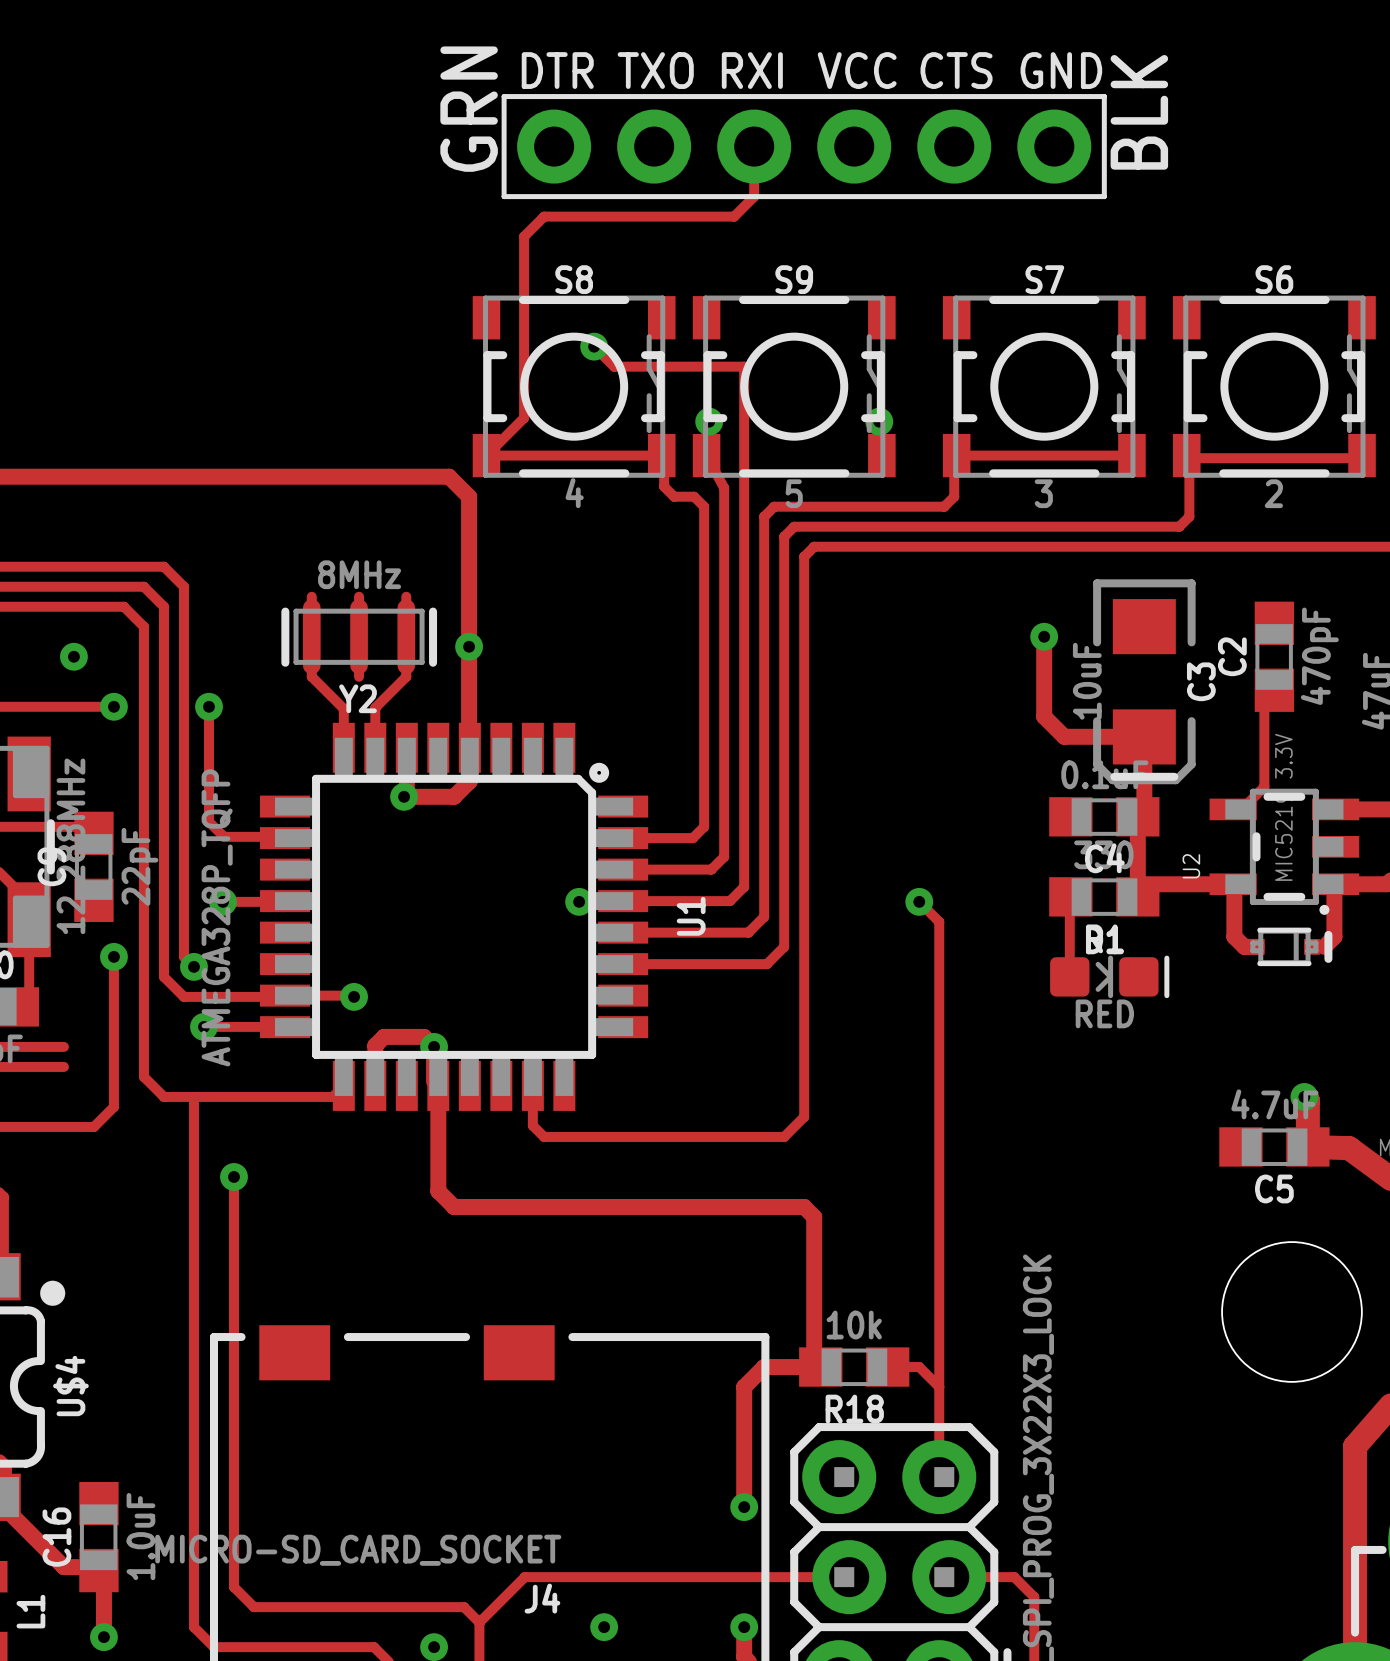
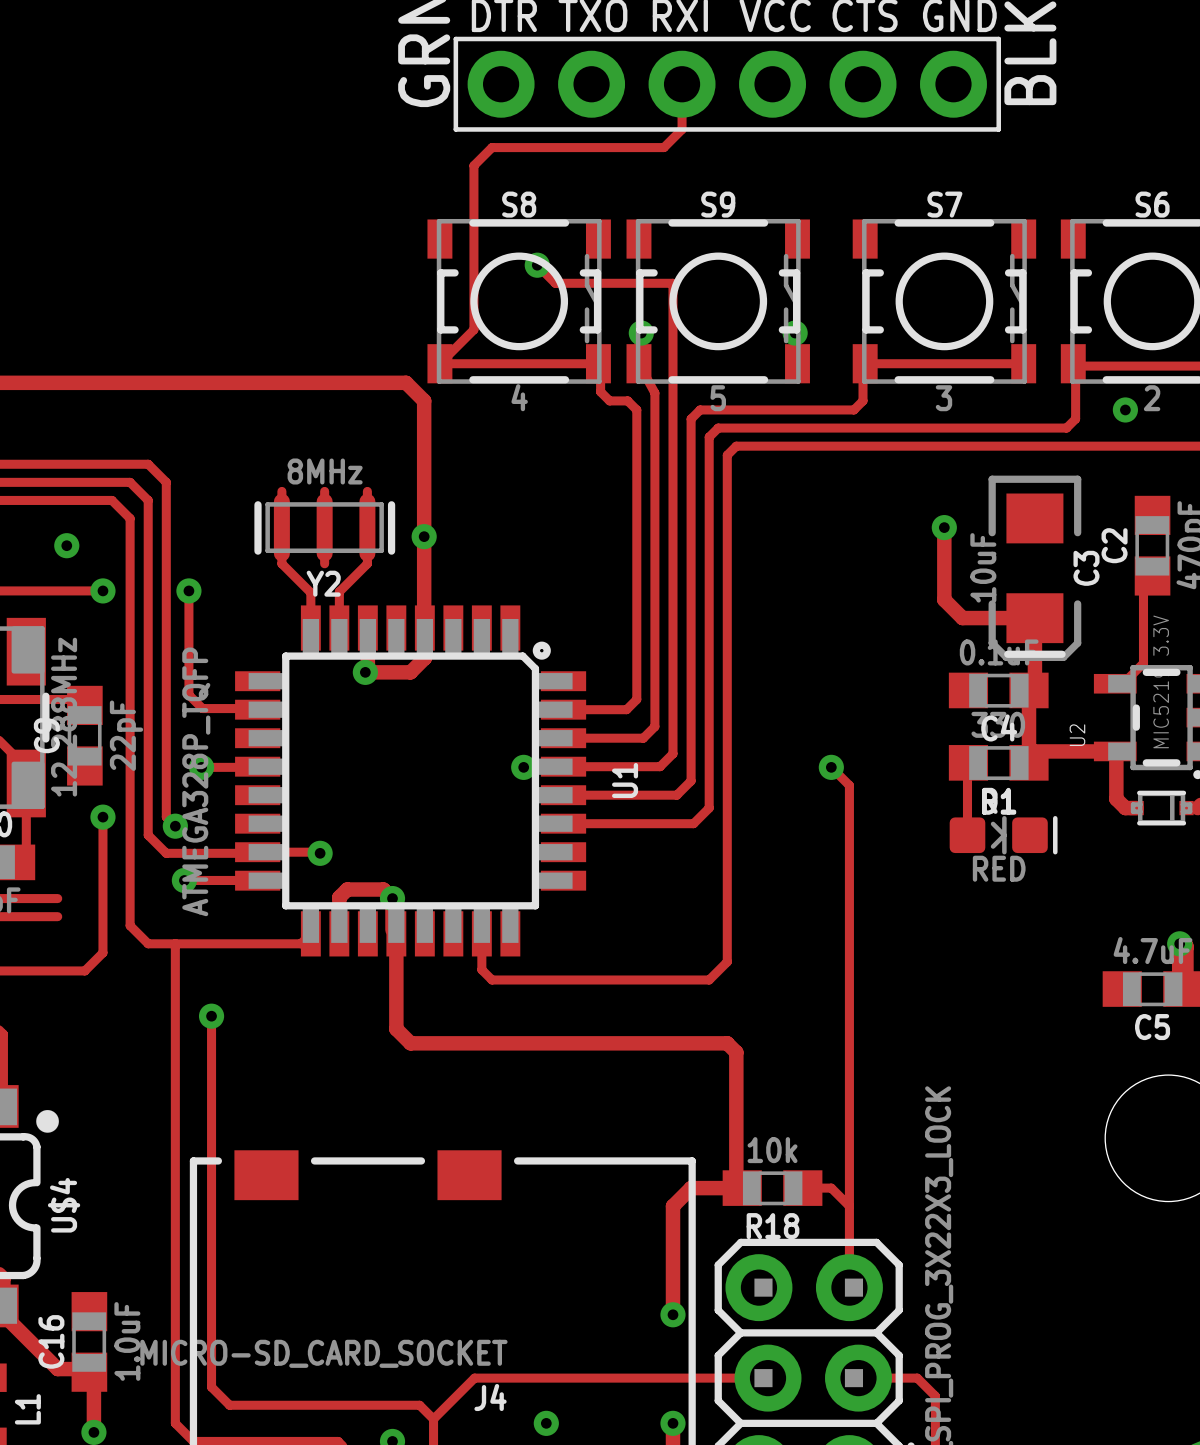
via: none -> (1125, 409)

